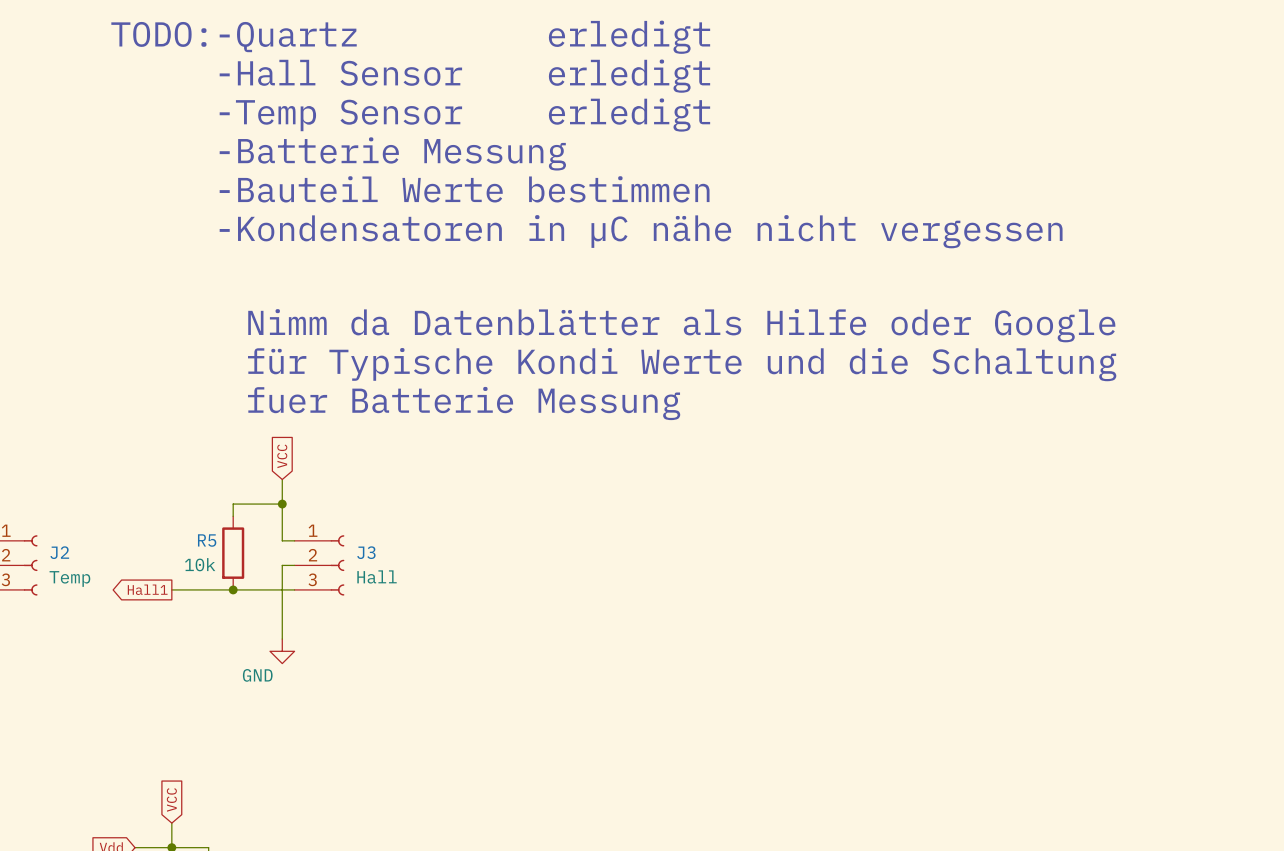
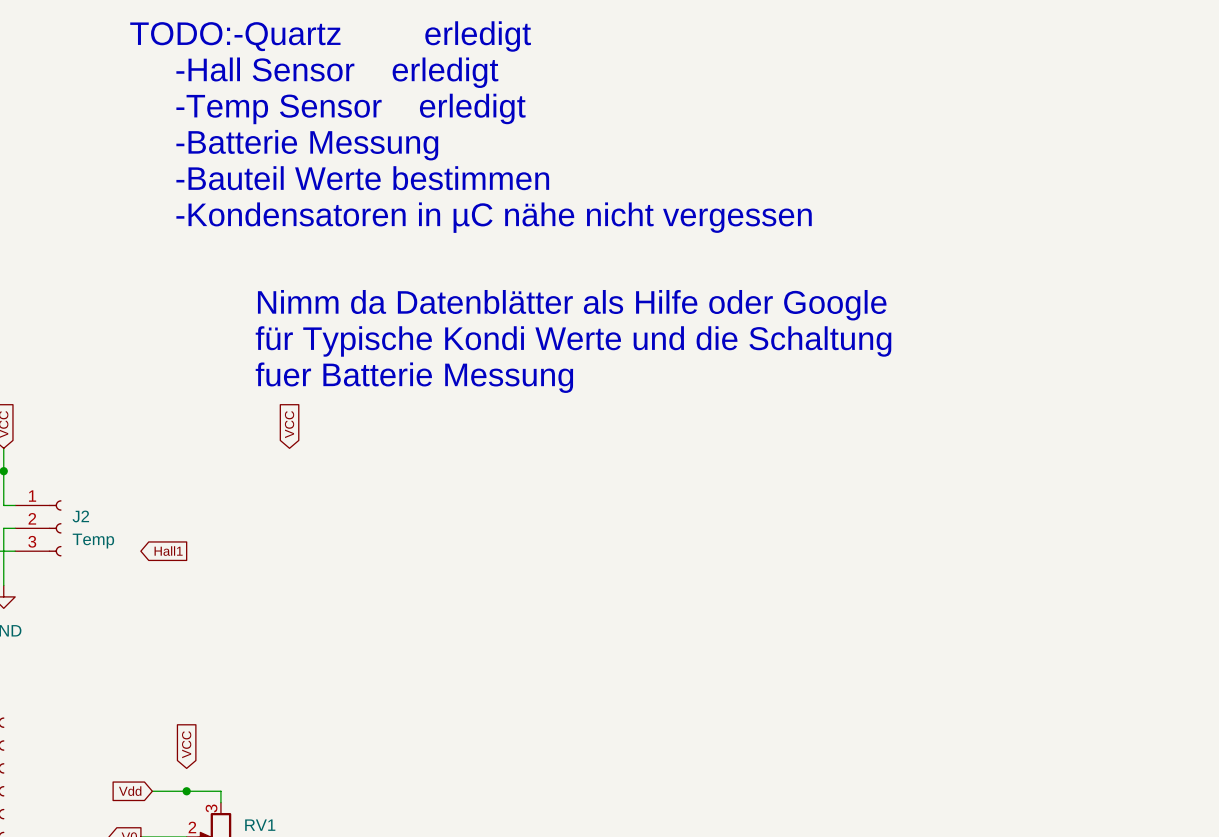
wire: (282, 479) (282, 540) (294, 540) -> none
wire: (282, 504) (233, 504) (233, 516) -> none
junction: (282, 504) -> none
R5: 10k (233, 553) -> none
wire: (294, 565) (282, 565) (282, 639) -> none
J3: Hall (319, 565) -> none
wire: (171, 589) (294, 589) -> none
junction: (233, 589) -> none
power symbol: GND (282, 651) -> none
wire: (171, 823) (171, 847) -> none

